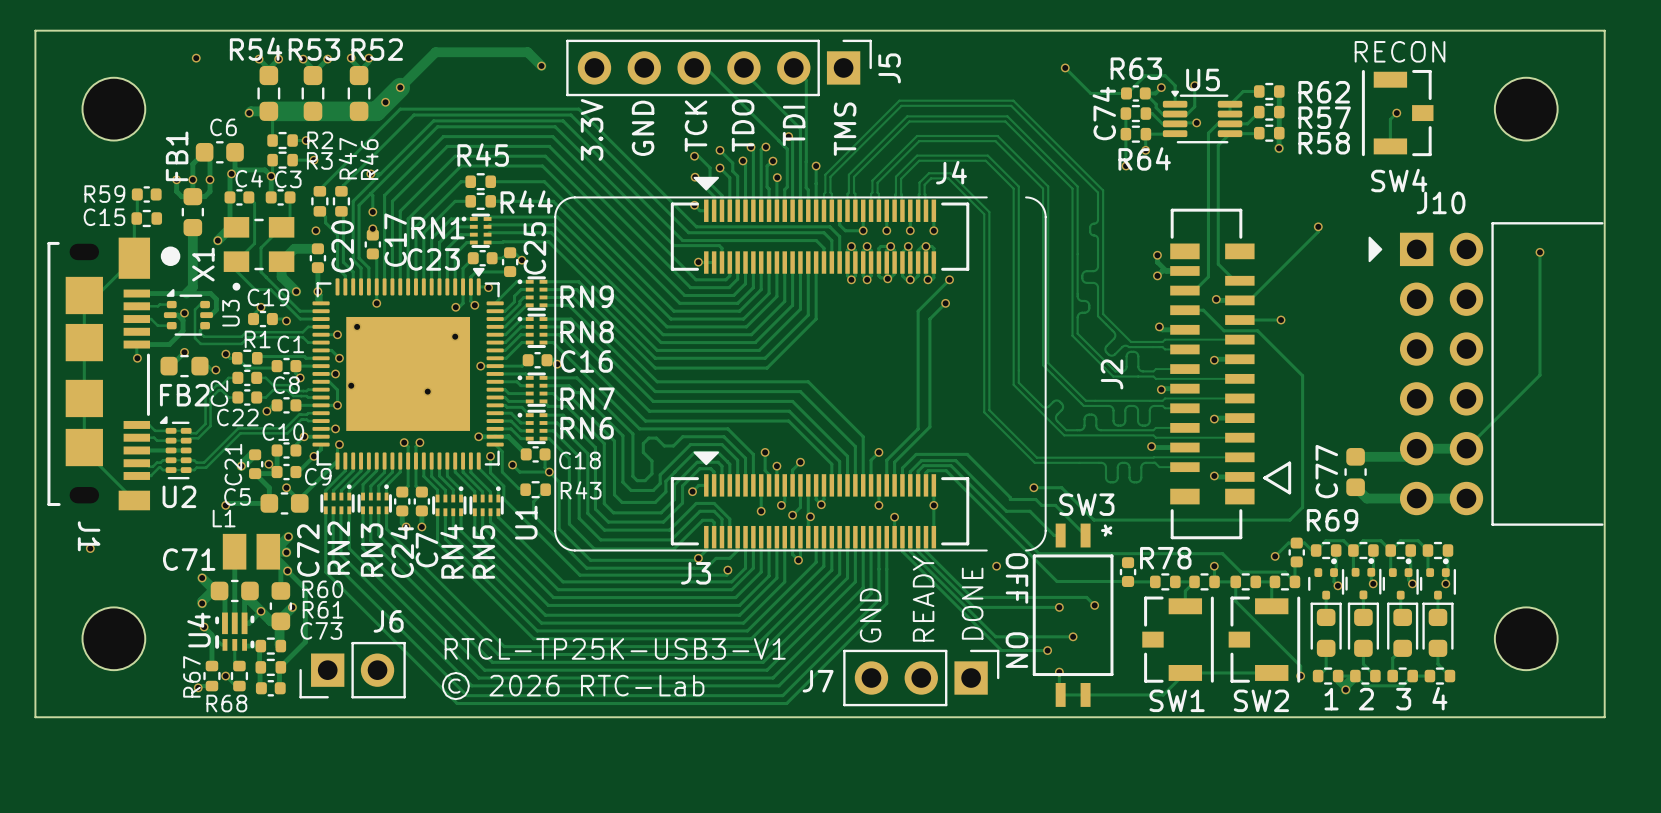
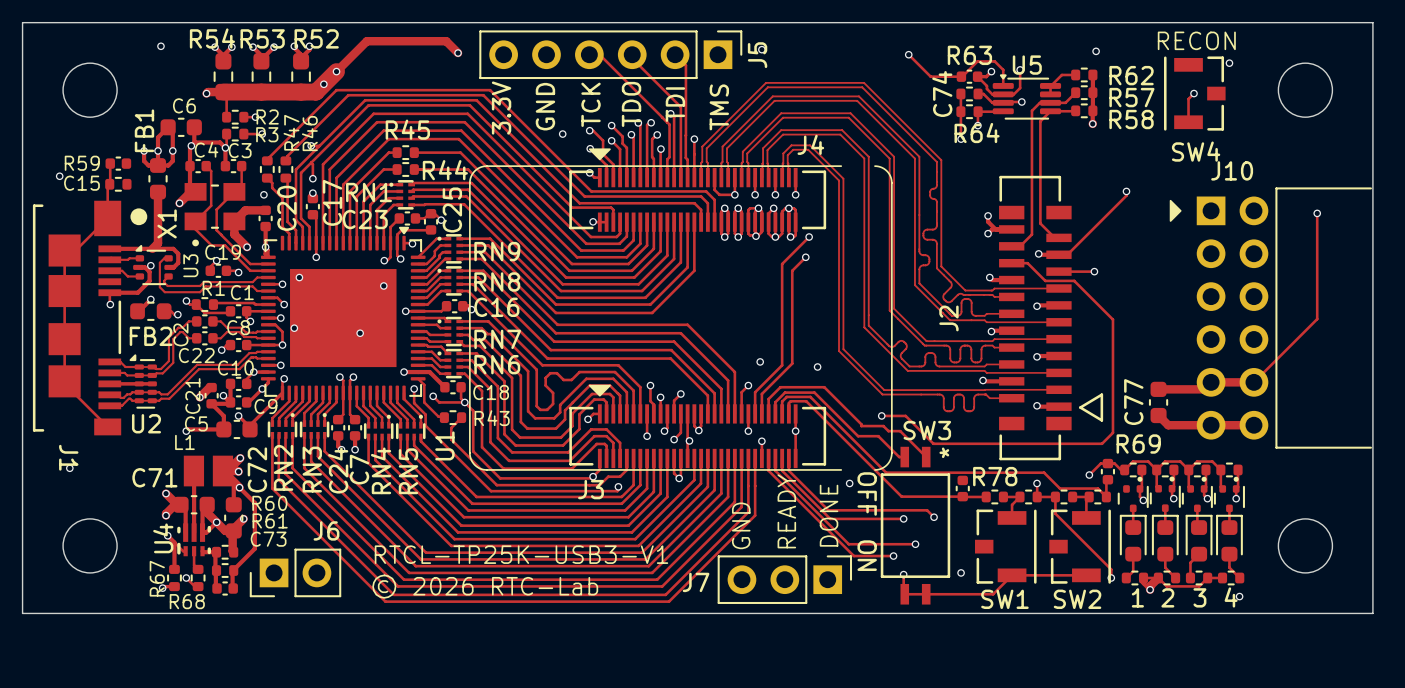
via: none -> (761, 49)
via: none -> (1096, 51)
via: none -> (1229, 63)
via: none -> (562, 134)
via: none -> (59, 176)
via: none -> (760, 361)
via: none -> (817, 367)
via: none -> (961, 572)
via: none -> (1239, 596)

